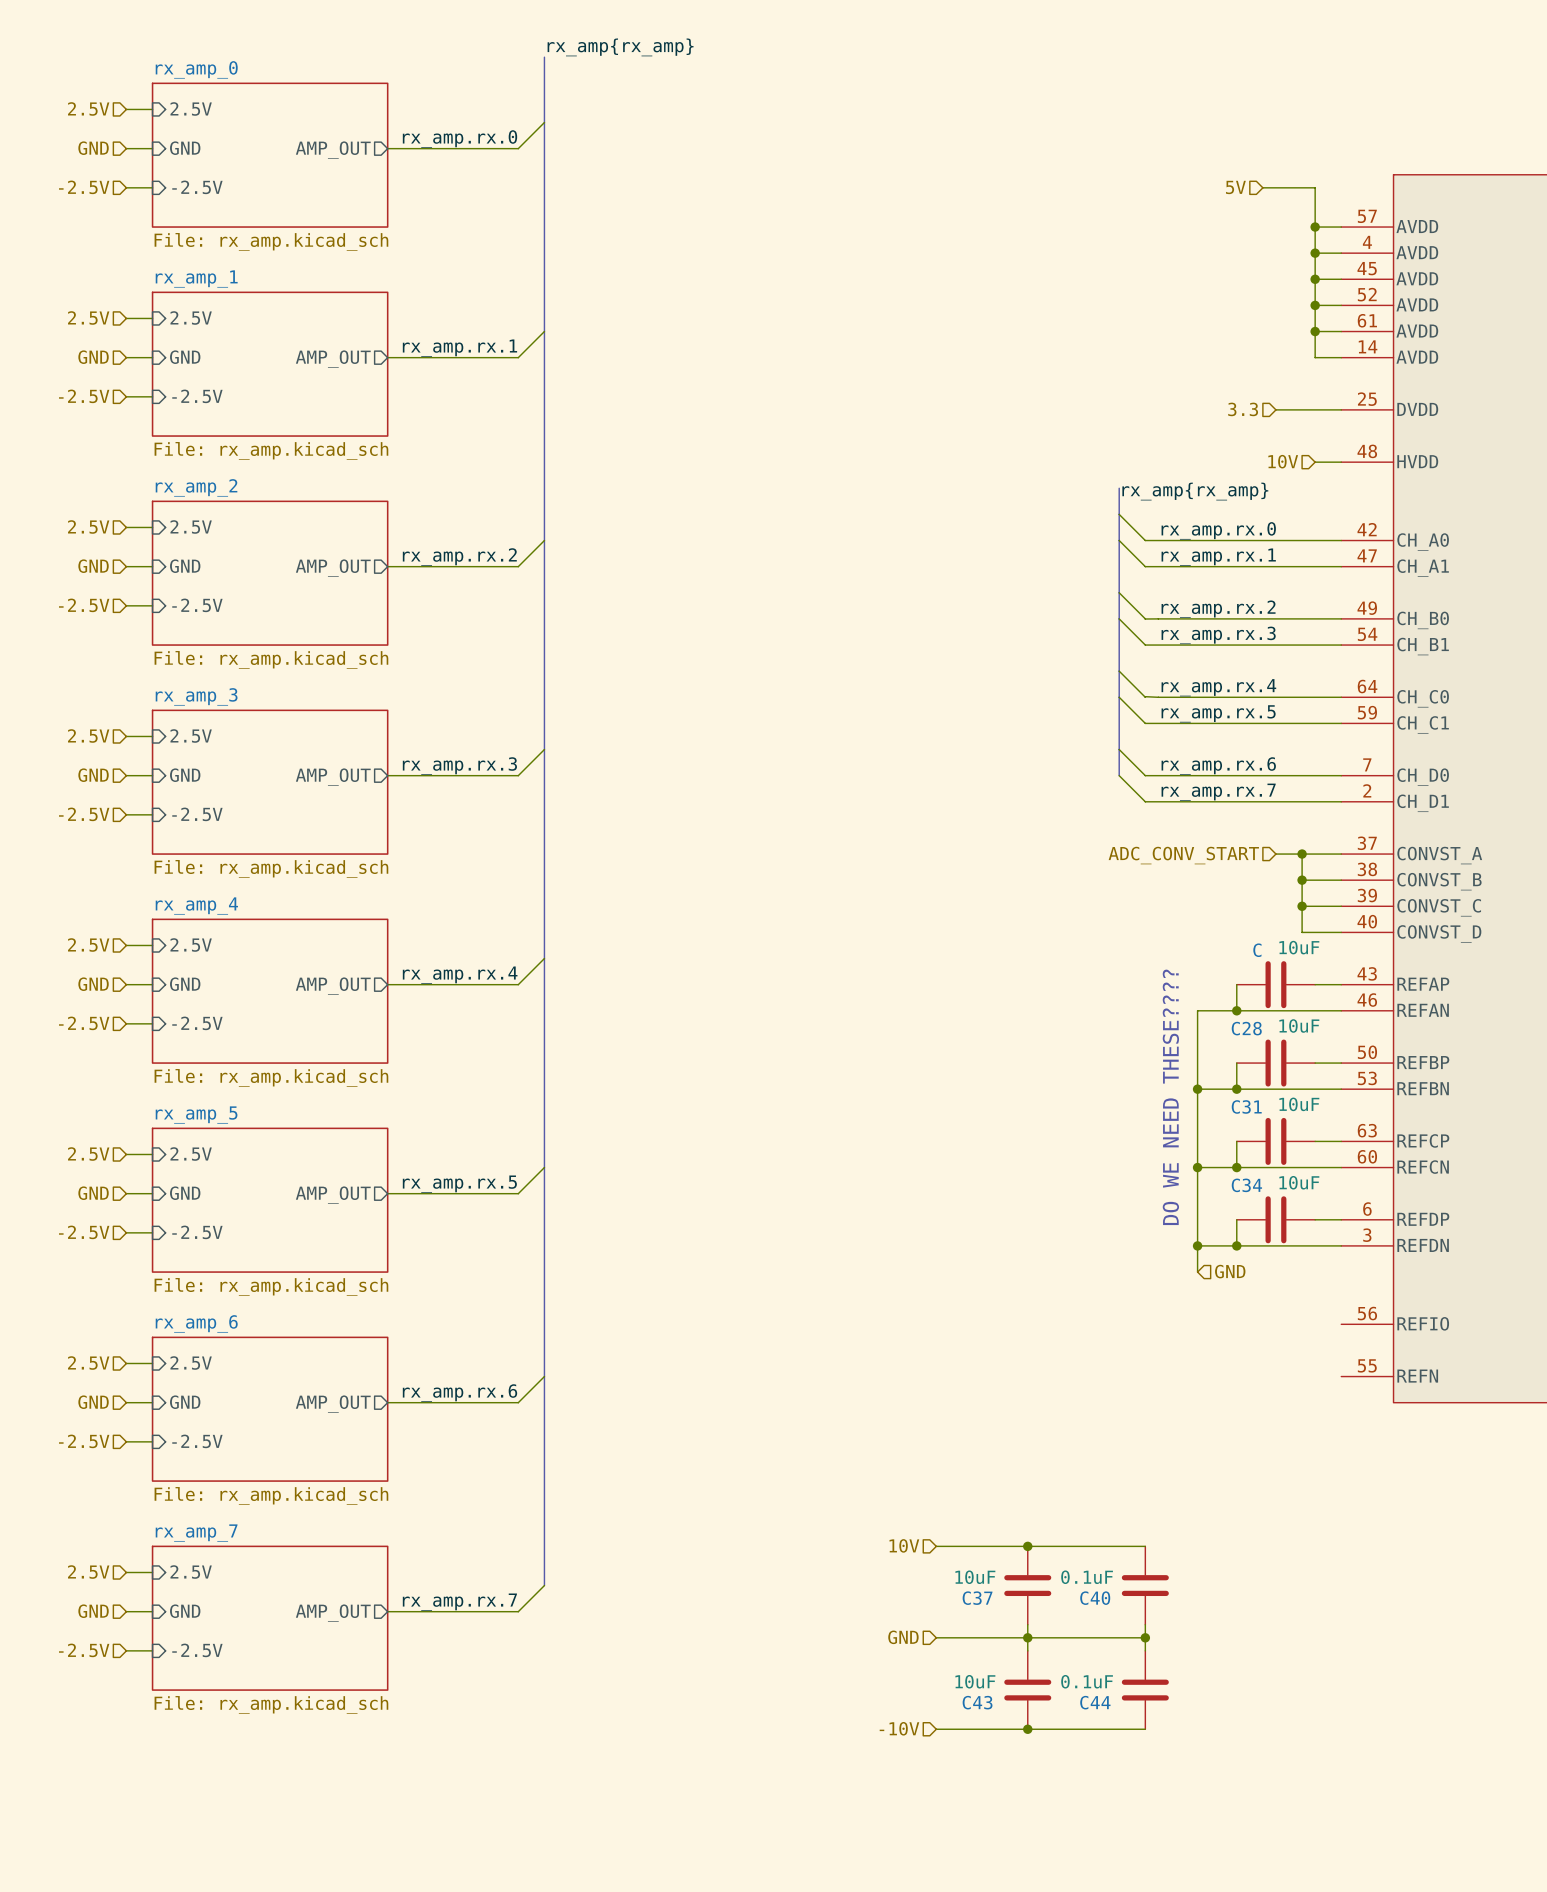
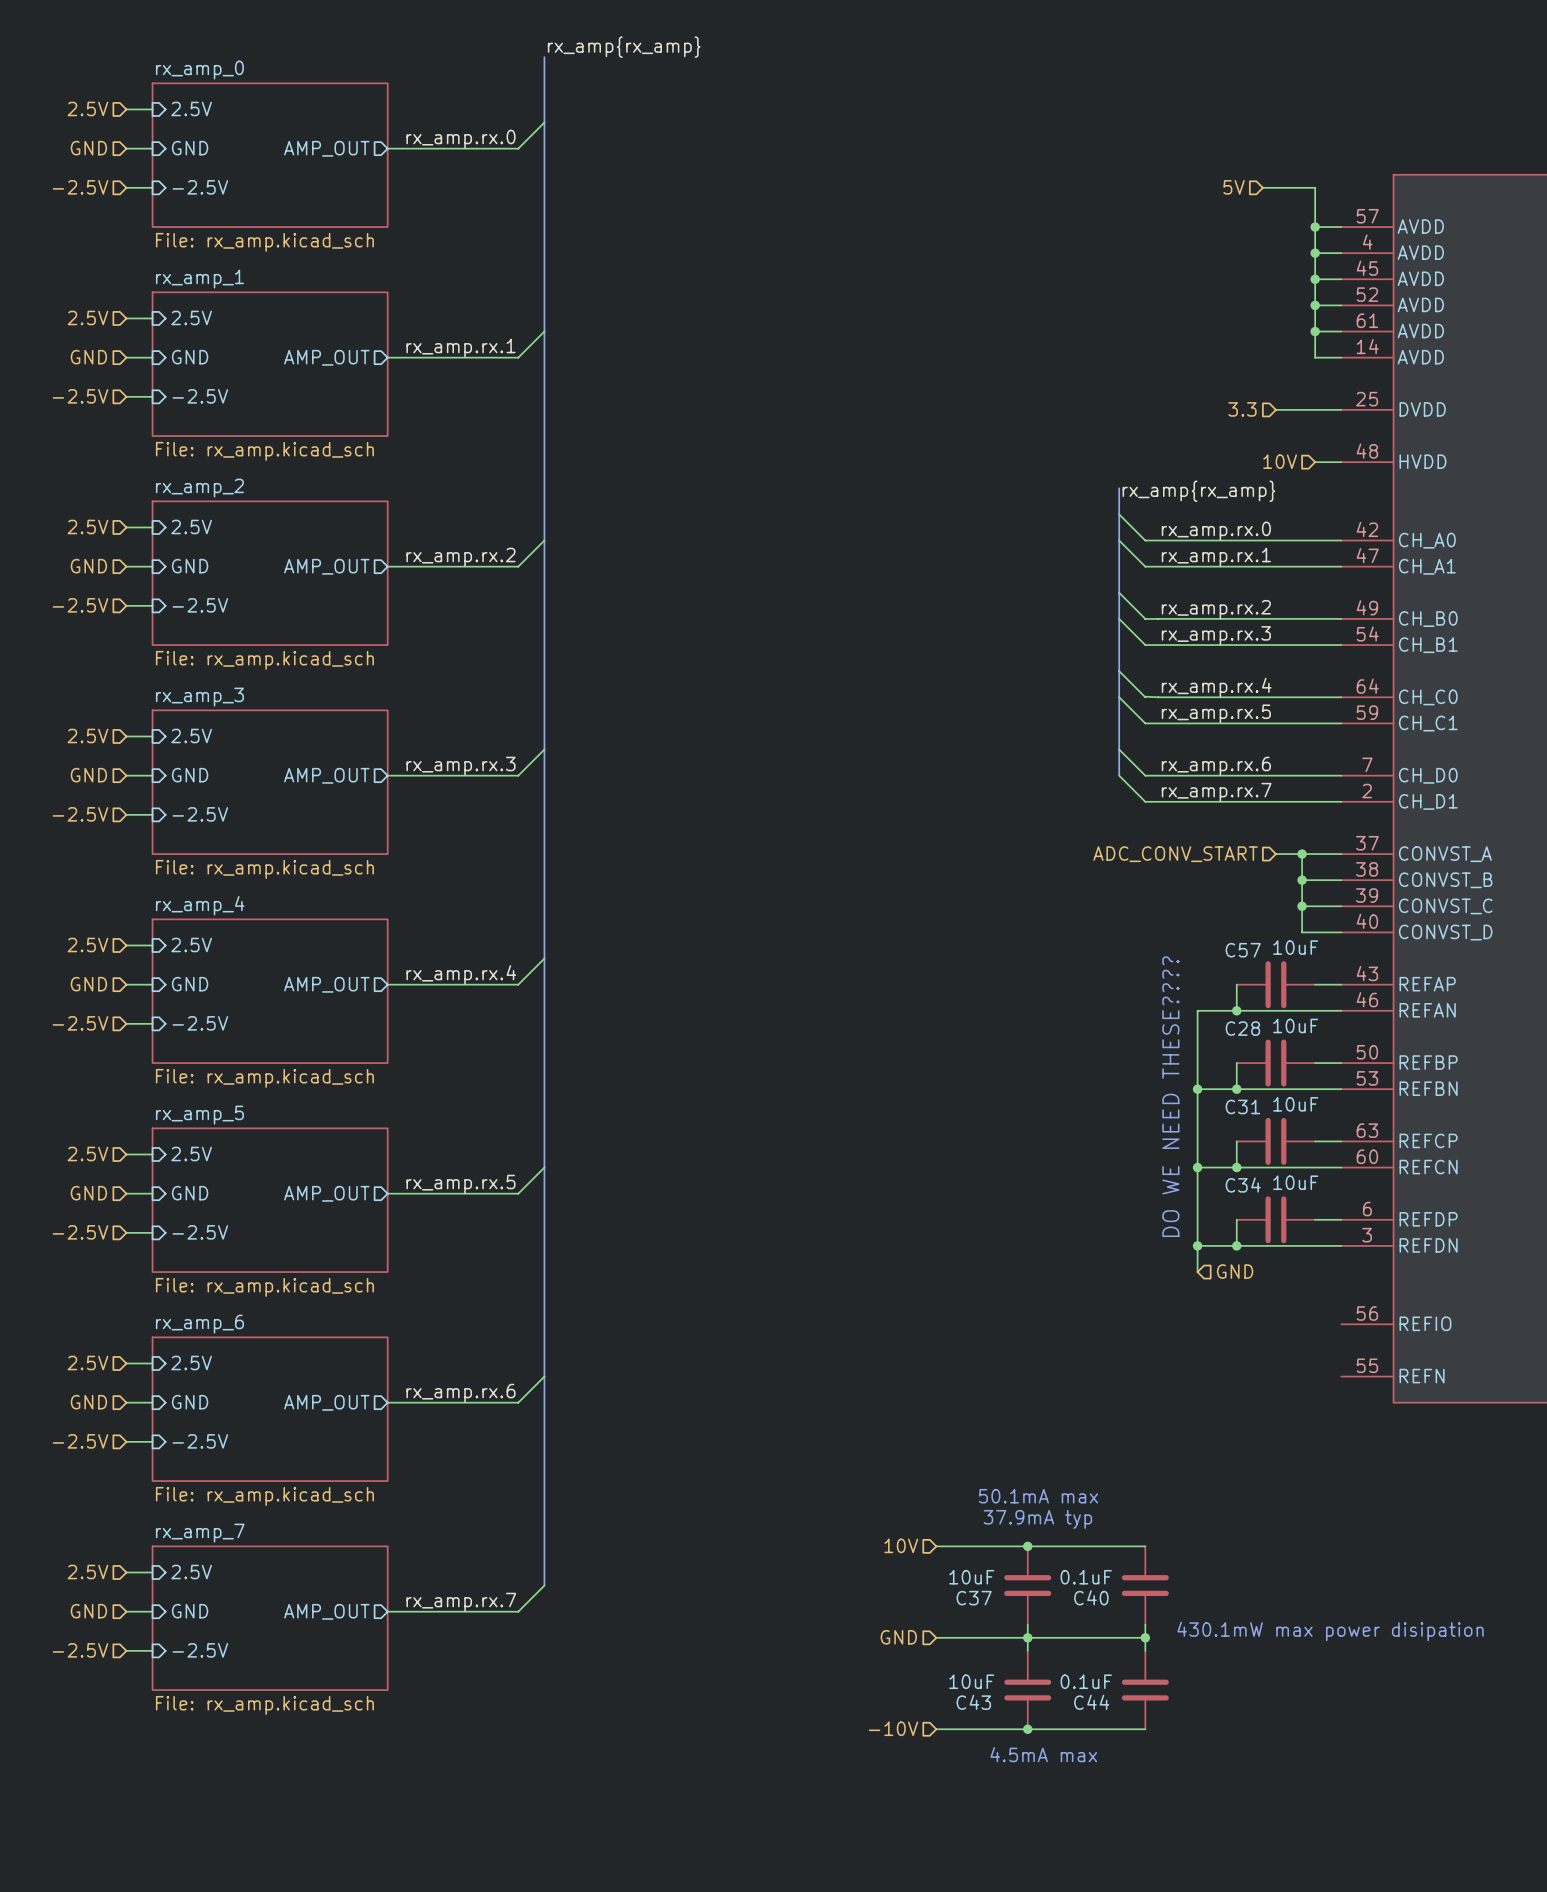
C name: C (1257, 950) -> C57 (1243, 950)
text: none -> 50.1mA max (1038, 1496)
text: none -> 37.9mA typ (1037, 1519)
text: none -> 430.1mW max power disipation (1330, 1631)
text: none -> 4.5mA max (1043, 1754)

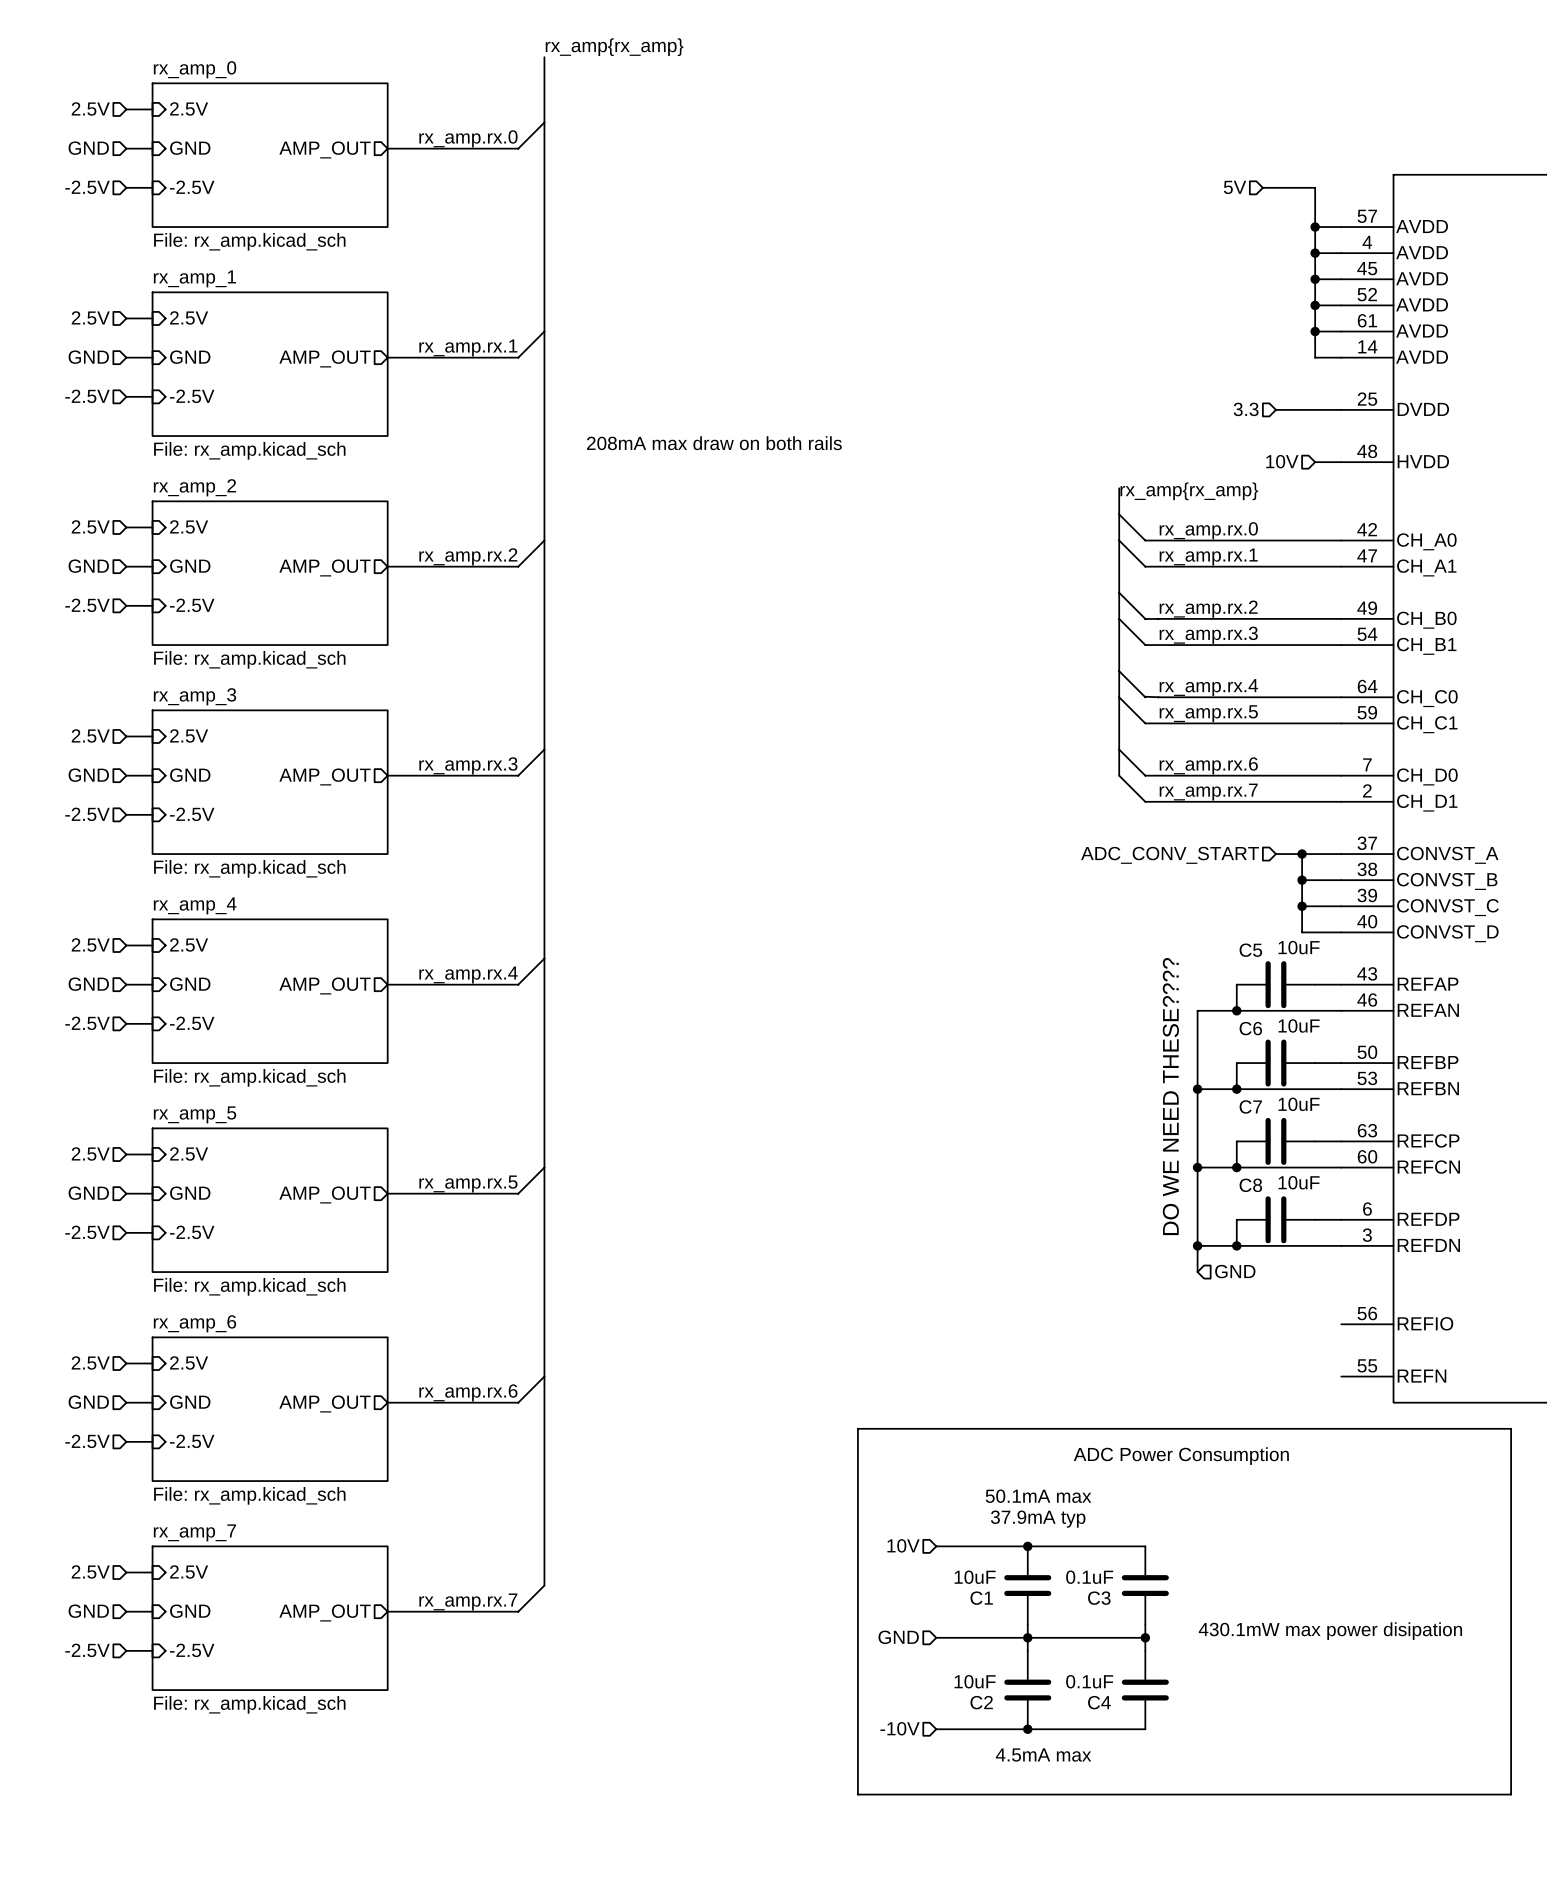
text: none -> 208mA max draw on both rails (714, 443)
C57 name: C57 (1243, 950) -> C5 (1250, 950)
C28 name: C28 (1242, 1028) -> C6 (1250, 1028)
C31 name: C31 (1242, 1106) -> C7 (1250, 1106)
C34 name: C34 (1243, 1185) -> C8 (1250, 1185)
line: none -> (857, 1428) (1511, 1428) (1511, 1794) (857, 1794) (857, 1428)
text: none -> ADC Power Consumption (1181, 1456)
C40 name: C40 (1091, 1597) -> C3 (1099, 1598)
C37 name: C37 (974, 1598) -> C1 (981, 1598)
C43 name: C43 (973, 1702) -> C2 (981, 1702)
C44 name: C44 (1091, 1702) -> C4 (1099, 1702)

